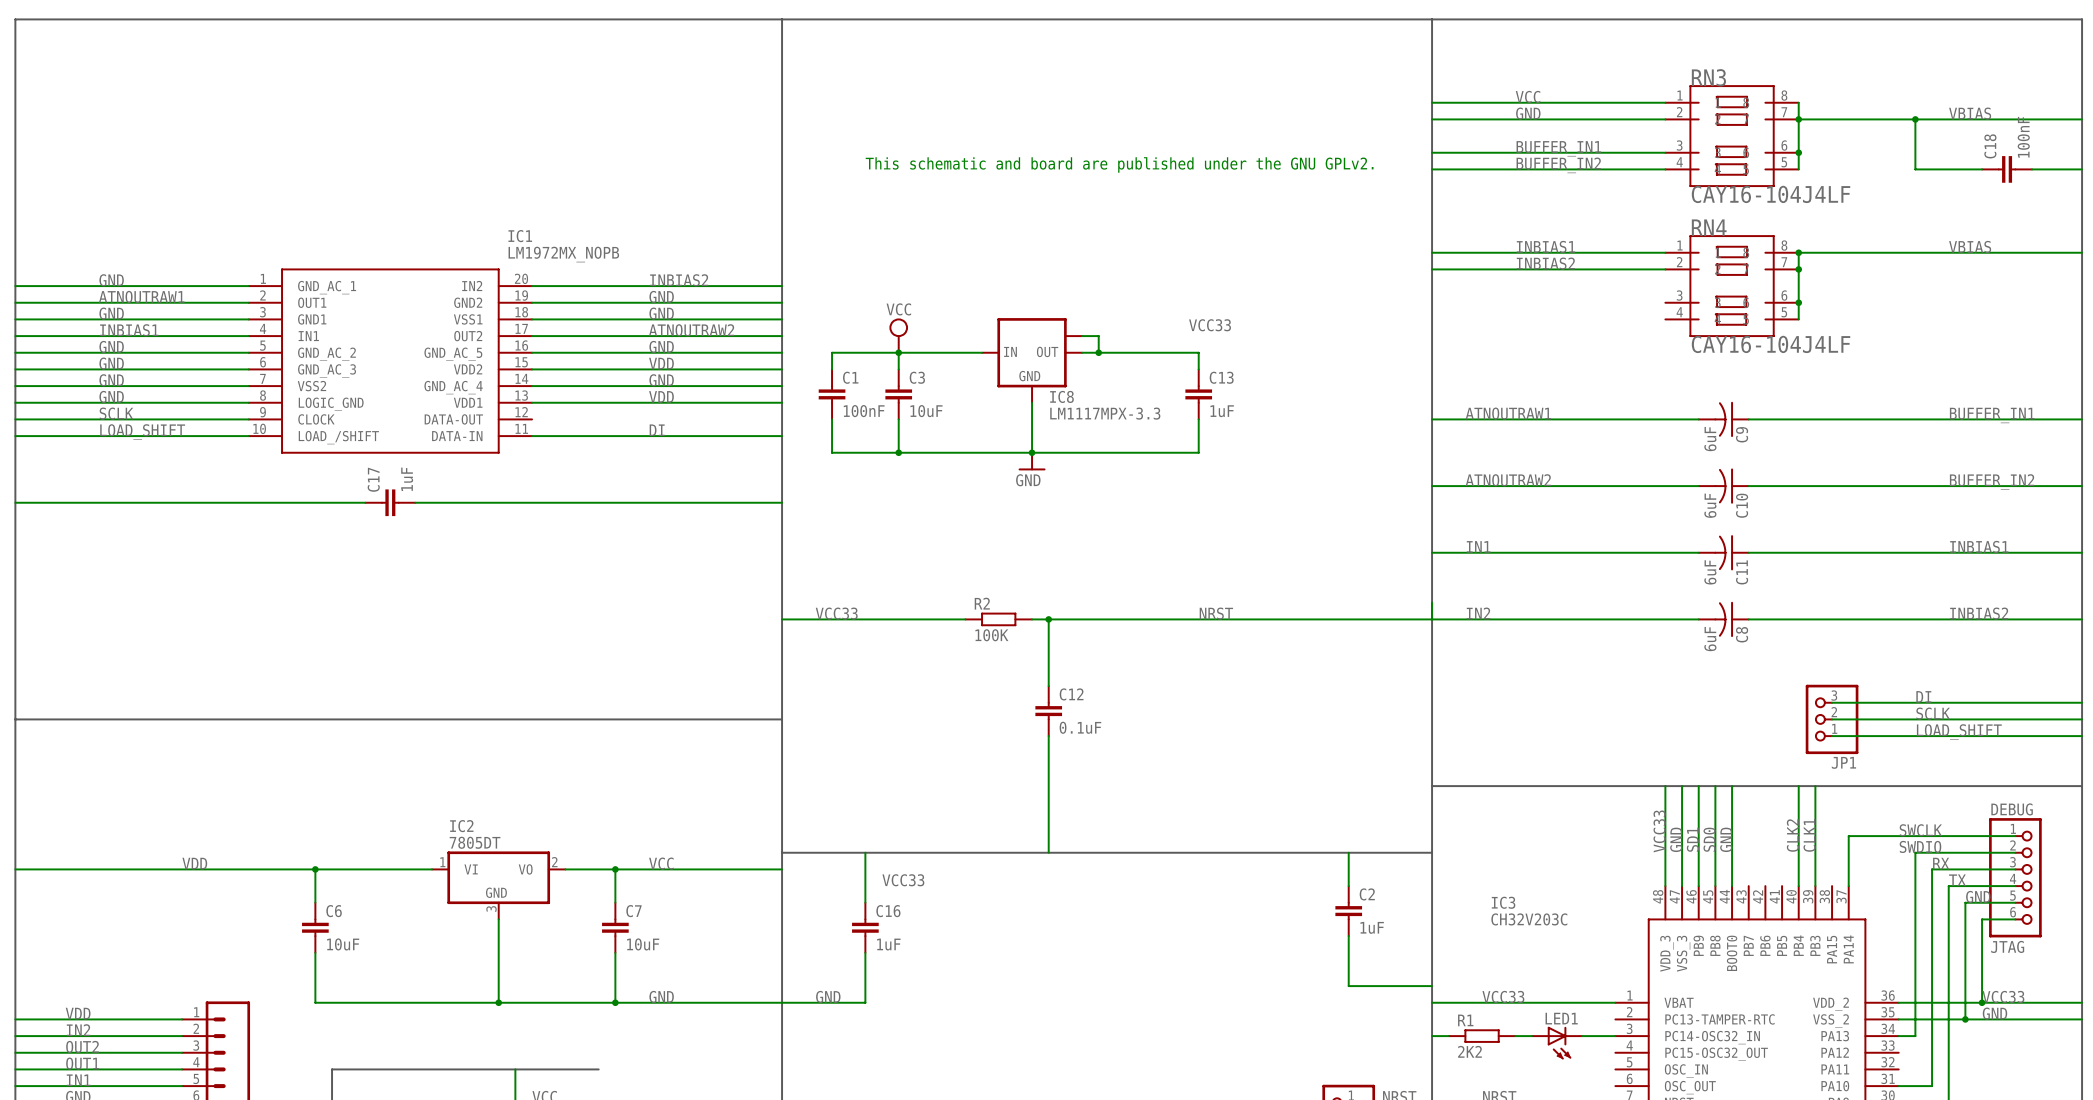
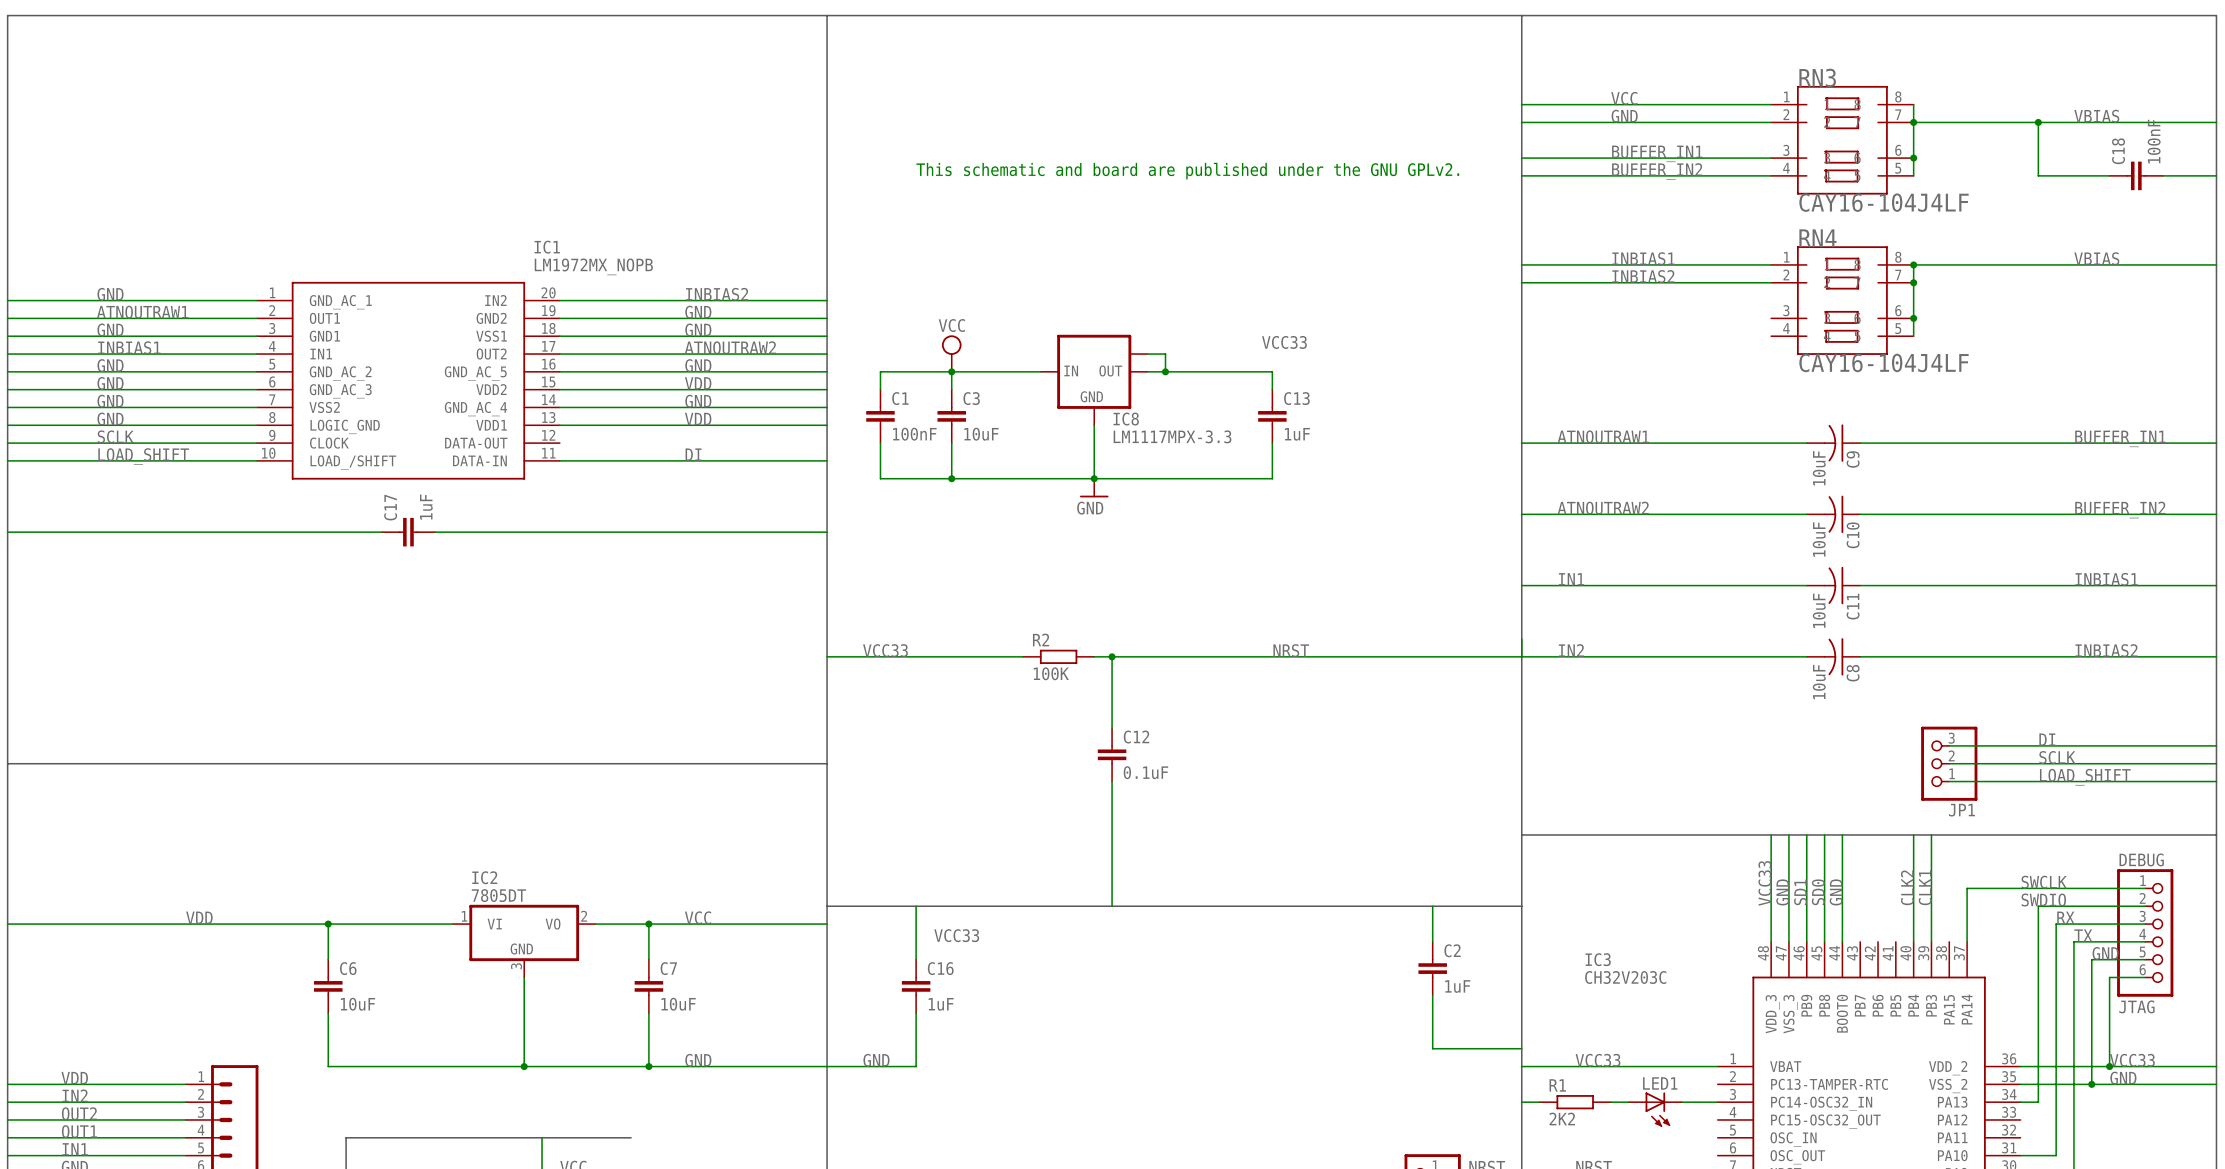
C9 value: 6uF (1710, 439) -> 10uF (1819, 468)
C10 value: 6uF (1710, 505) -> 10uF (1819, 539)
C11 value: 6uF (1710, 572) -> 10uF (1819, 610)
C8 value: 6uF (1710, 639) -> 10uF (1819, 682)

